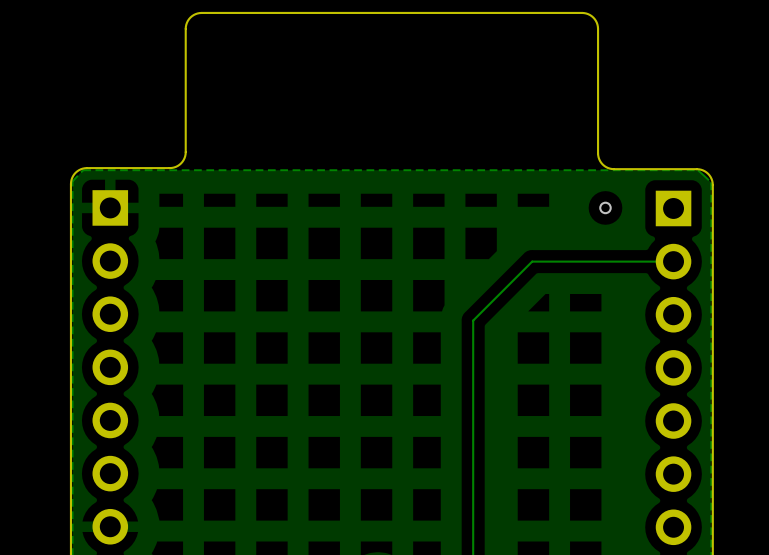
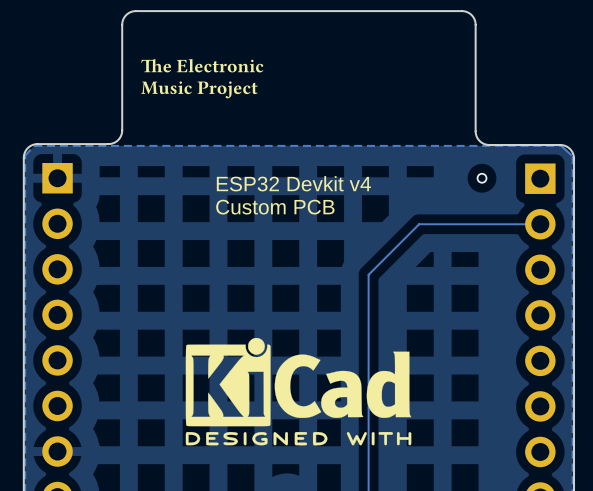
drawing: none -> [141, 58, 264, 99]
text: none -> ESP32 Devkit v4 (293, 183)
text: none -> Custom PCB (275, 207)
drawing: none -> [185, 337, 412, 446]

